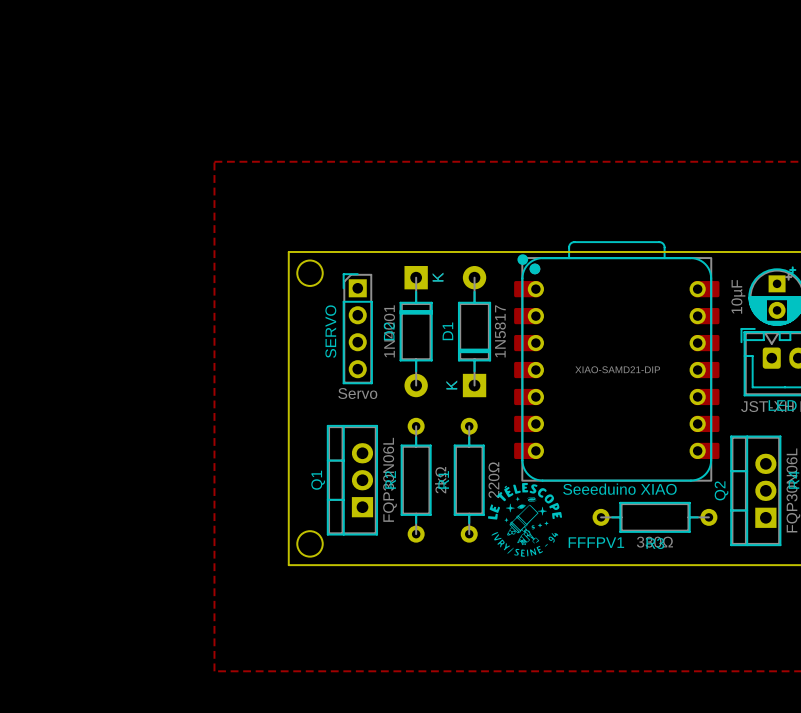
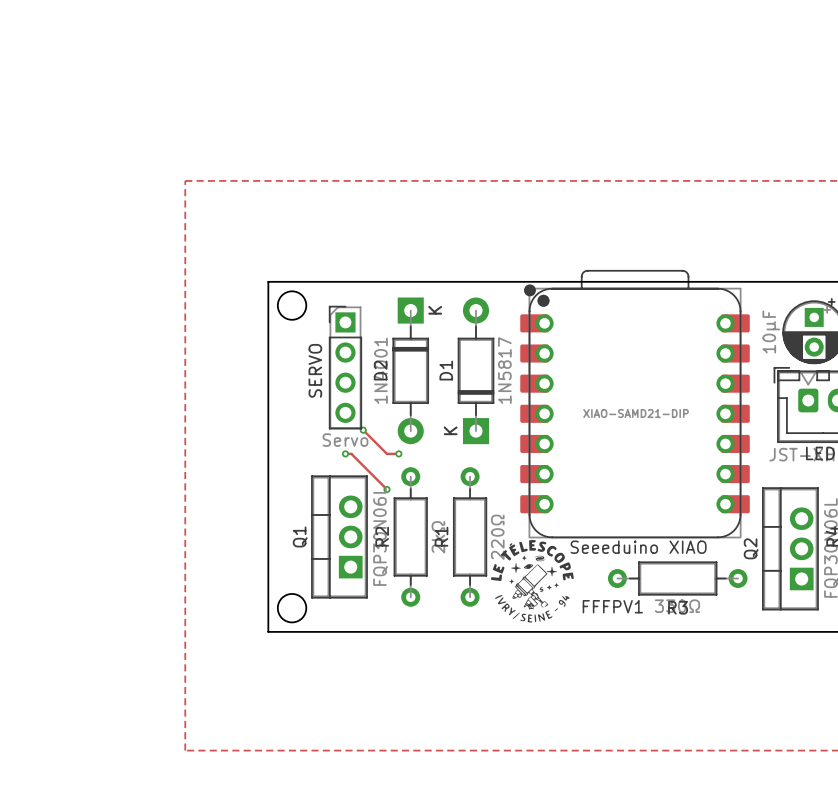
track: none -> (363, 430) (387, 453) (398, 453)
via: none -> (363, 430)
track: none -> (345, 453) (351, 453) (387, 489)
via: none -> (345, 453)
via: none -> (398, 453)
via: none -> (387, 489)

